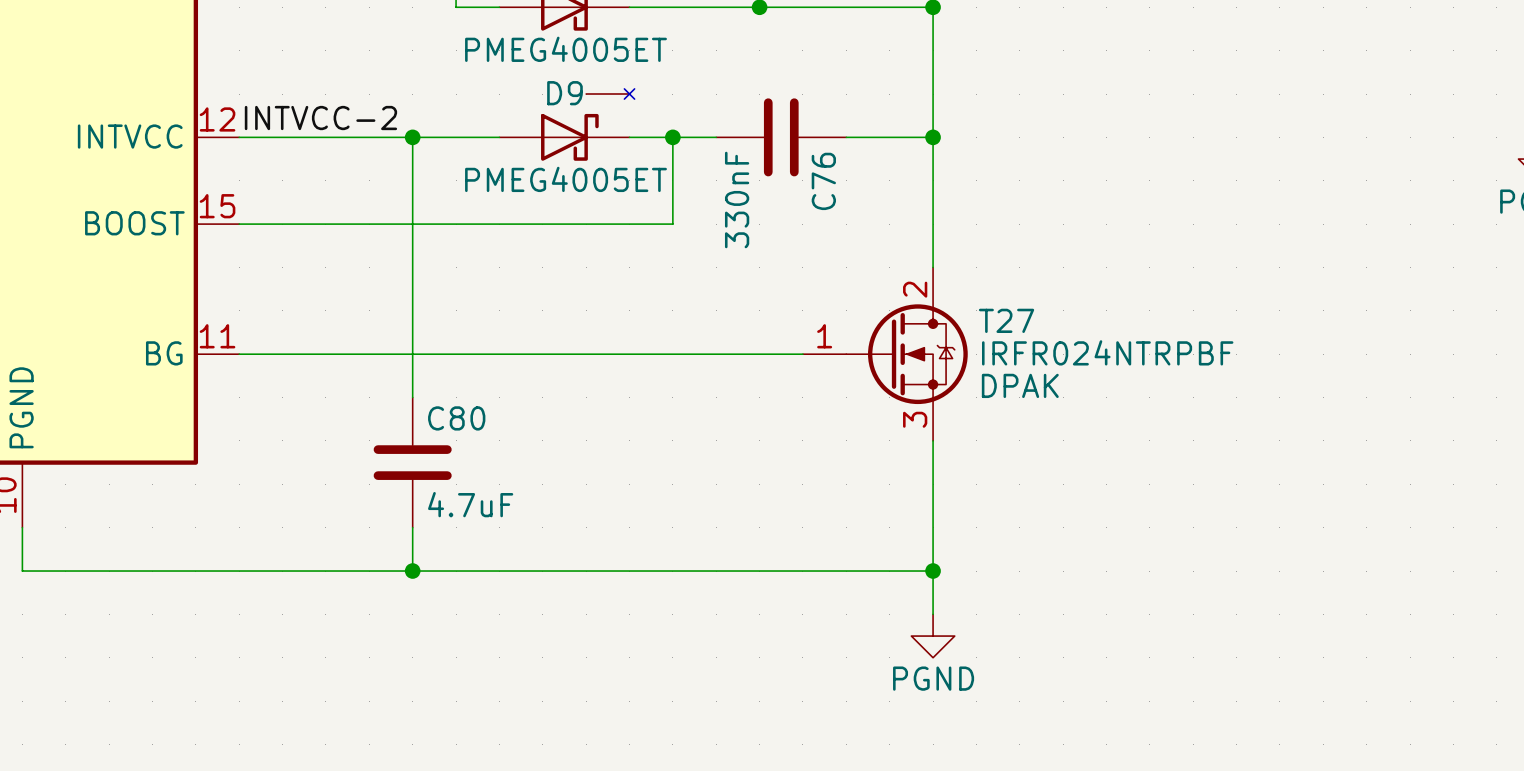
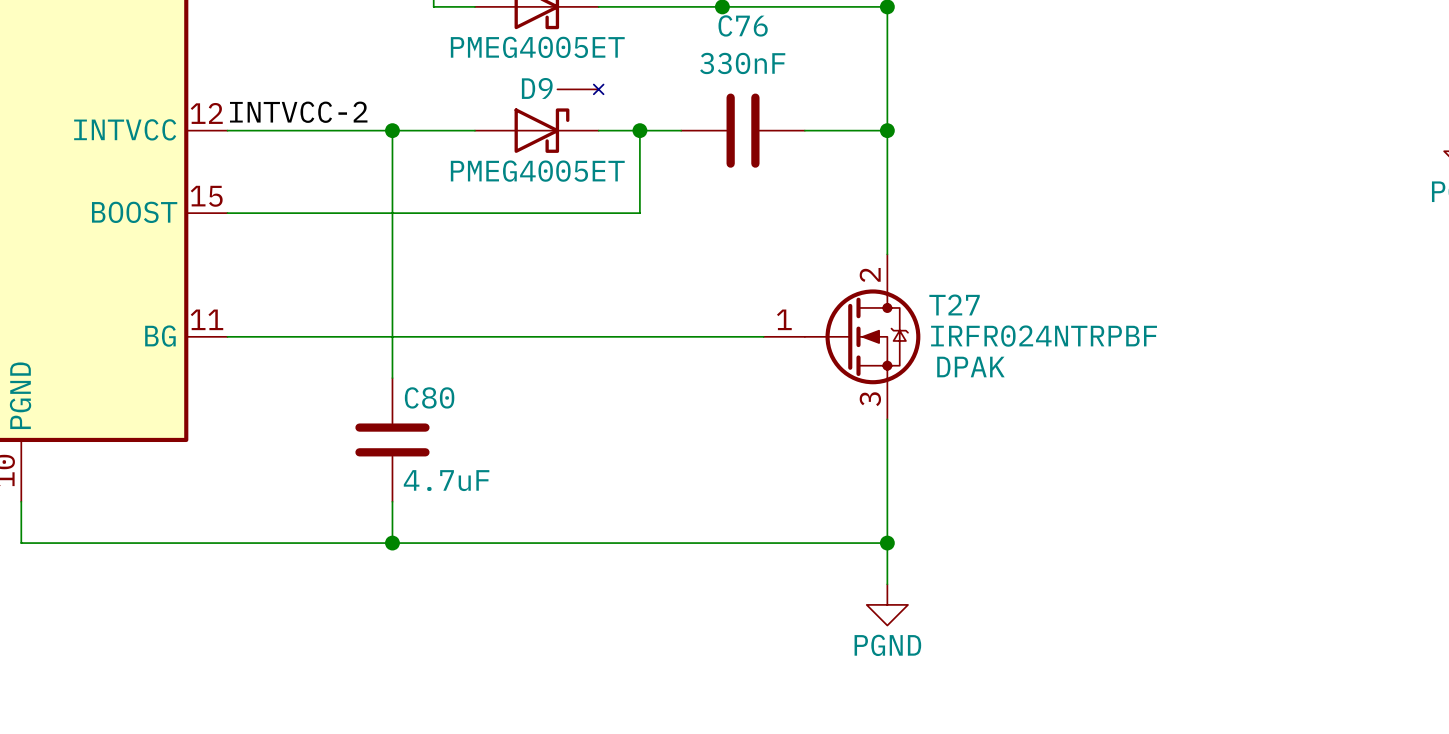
C76 name rotation: 0° (823, 181) -> 90° clockwise (743, 25)
C76 name position: C76 (823, 181) -> C76 (743, 25)
C76 value rotation: 0° (737, 199) -> 90° clockwise (742, 63)
C76 value position: 330nF (737, 199) -> 330nF (742, 63)

